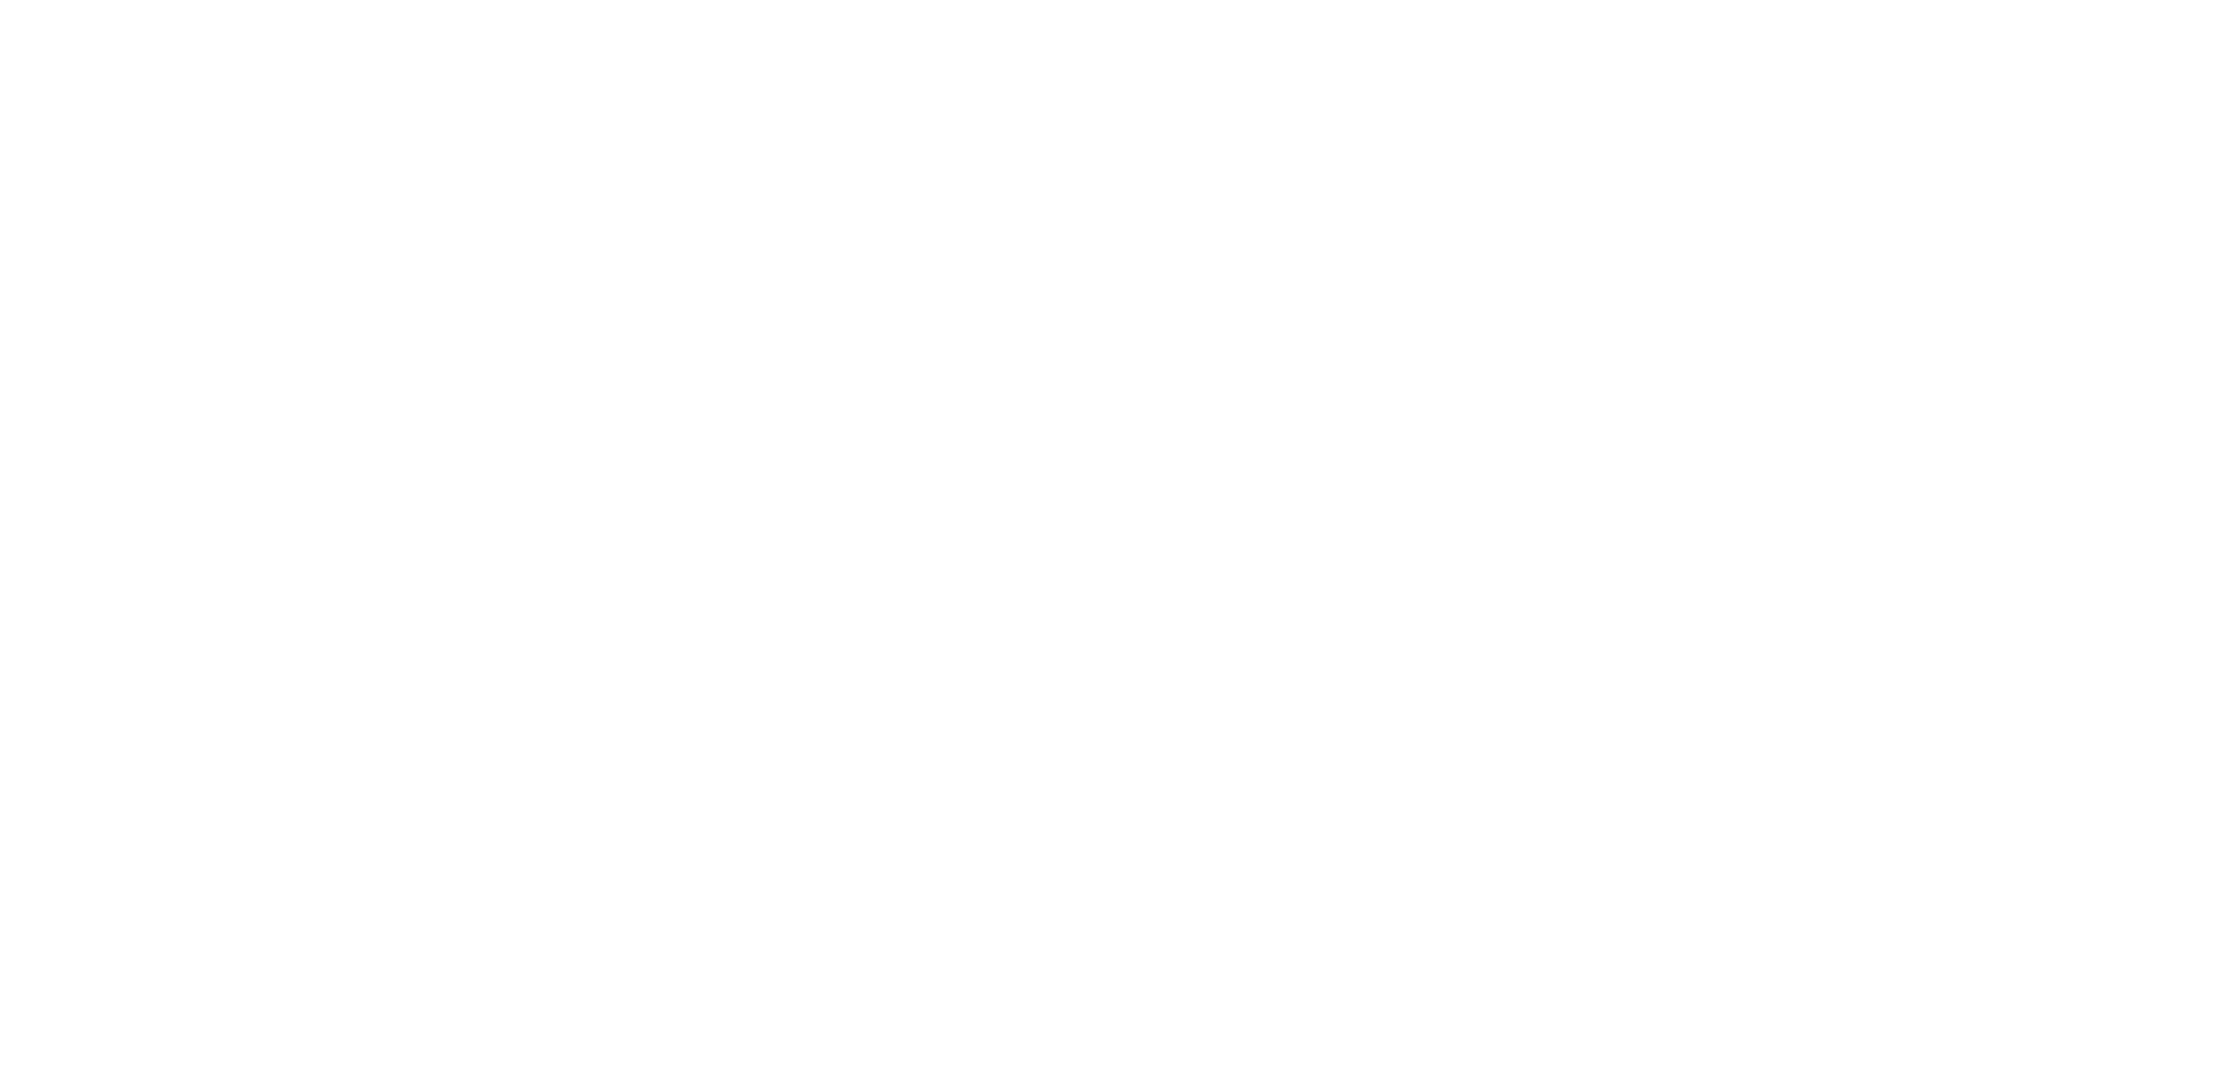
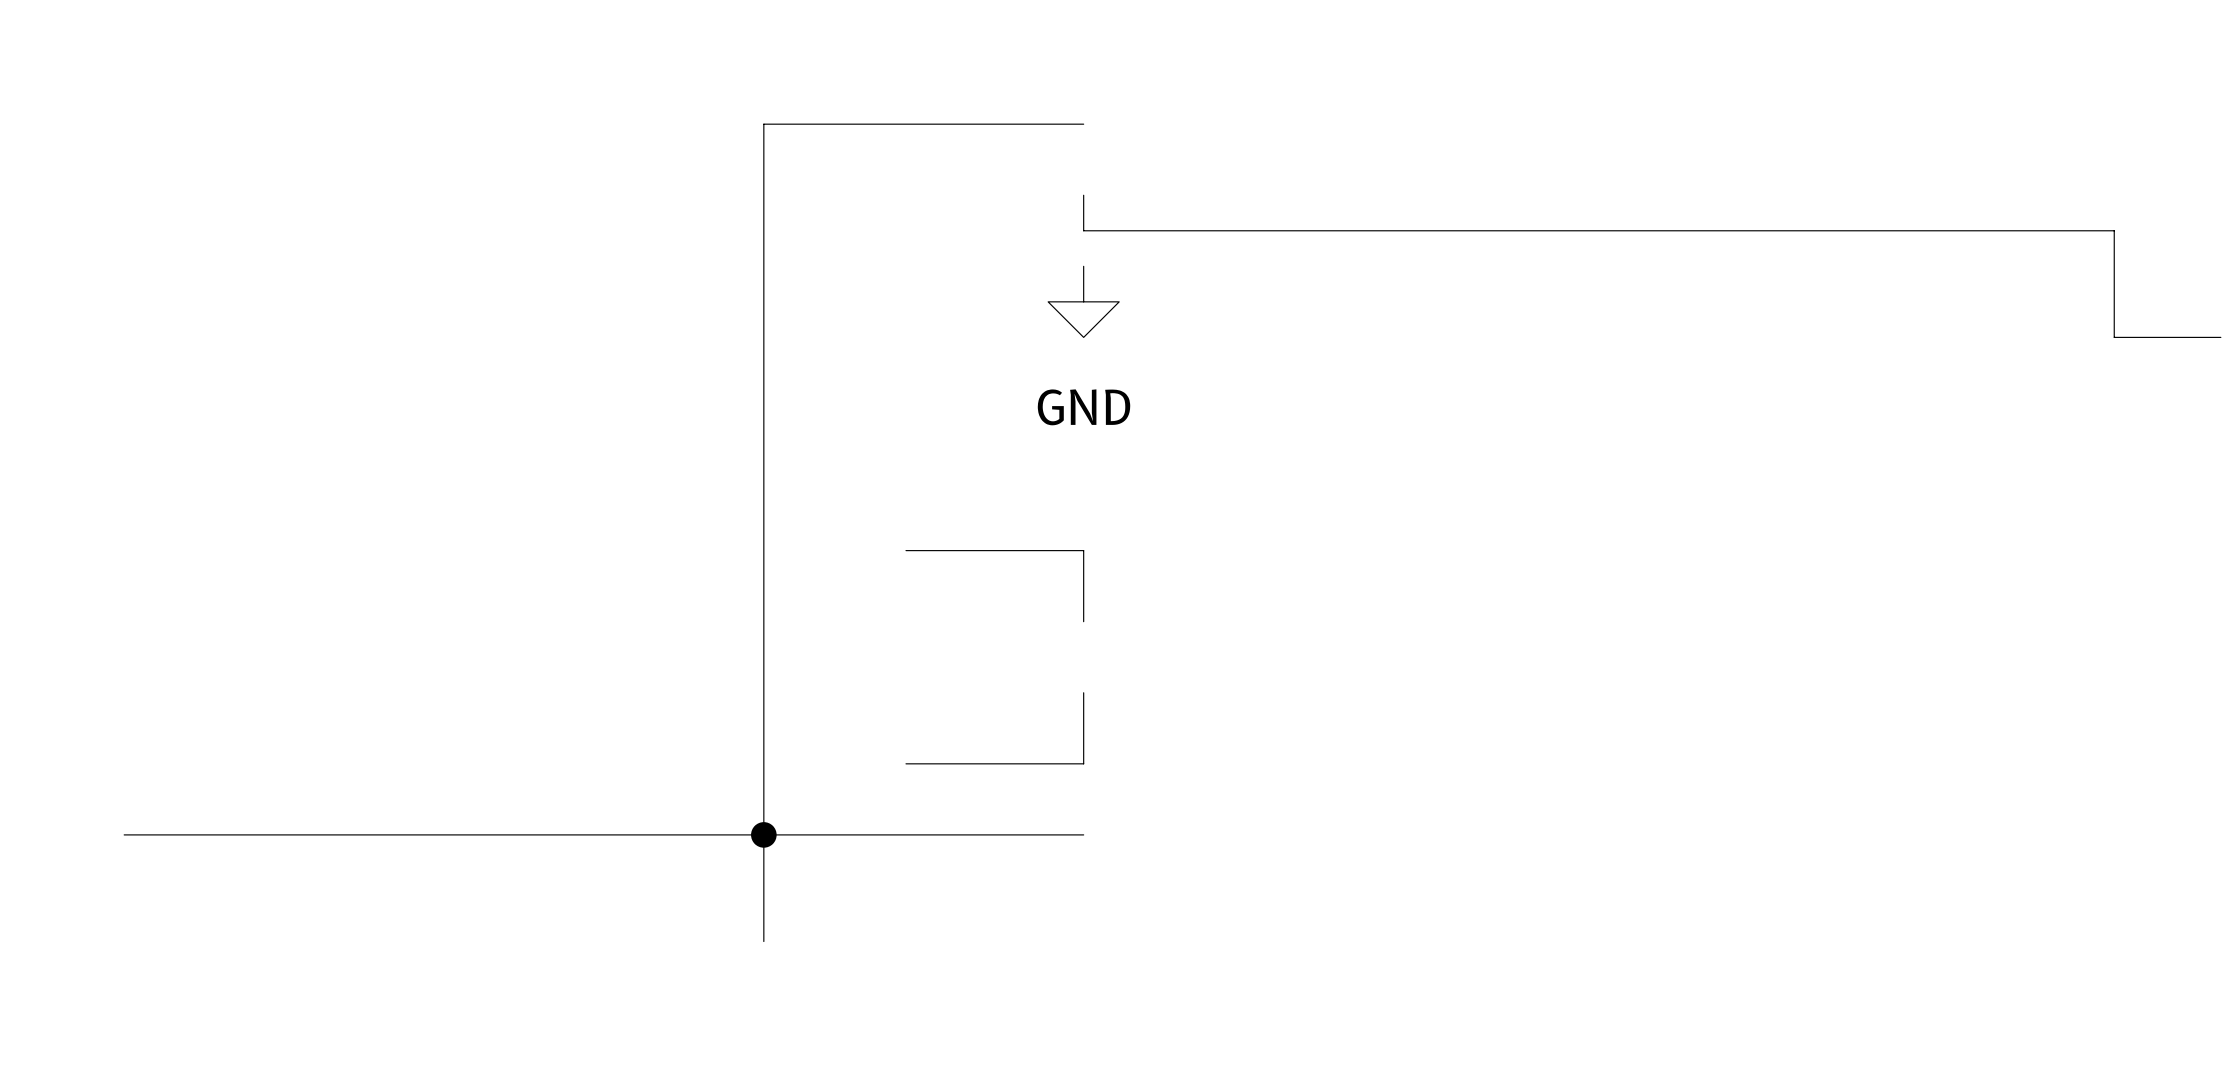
wire: none -> (1083, 124) (763, 124) (763, 941)
wire: none -> (1083, 195) (1083, 230) (2114, 230) (2114, 337) (2220, 337)
power symbol: none -> GND (1083, 301)
wire: none -> (905, 550) (1083, 550) (1083, 621)
wire: none -> (1083, 692) (1083, 763) (905, 763)
wire: none -> (124, 834) (1083, 834)
junction: none -> (763, 834)

